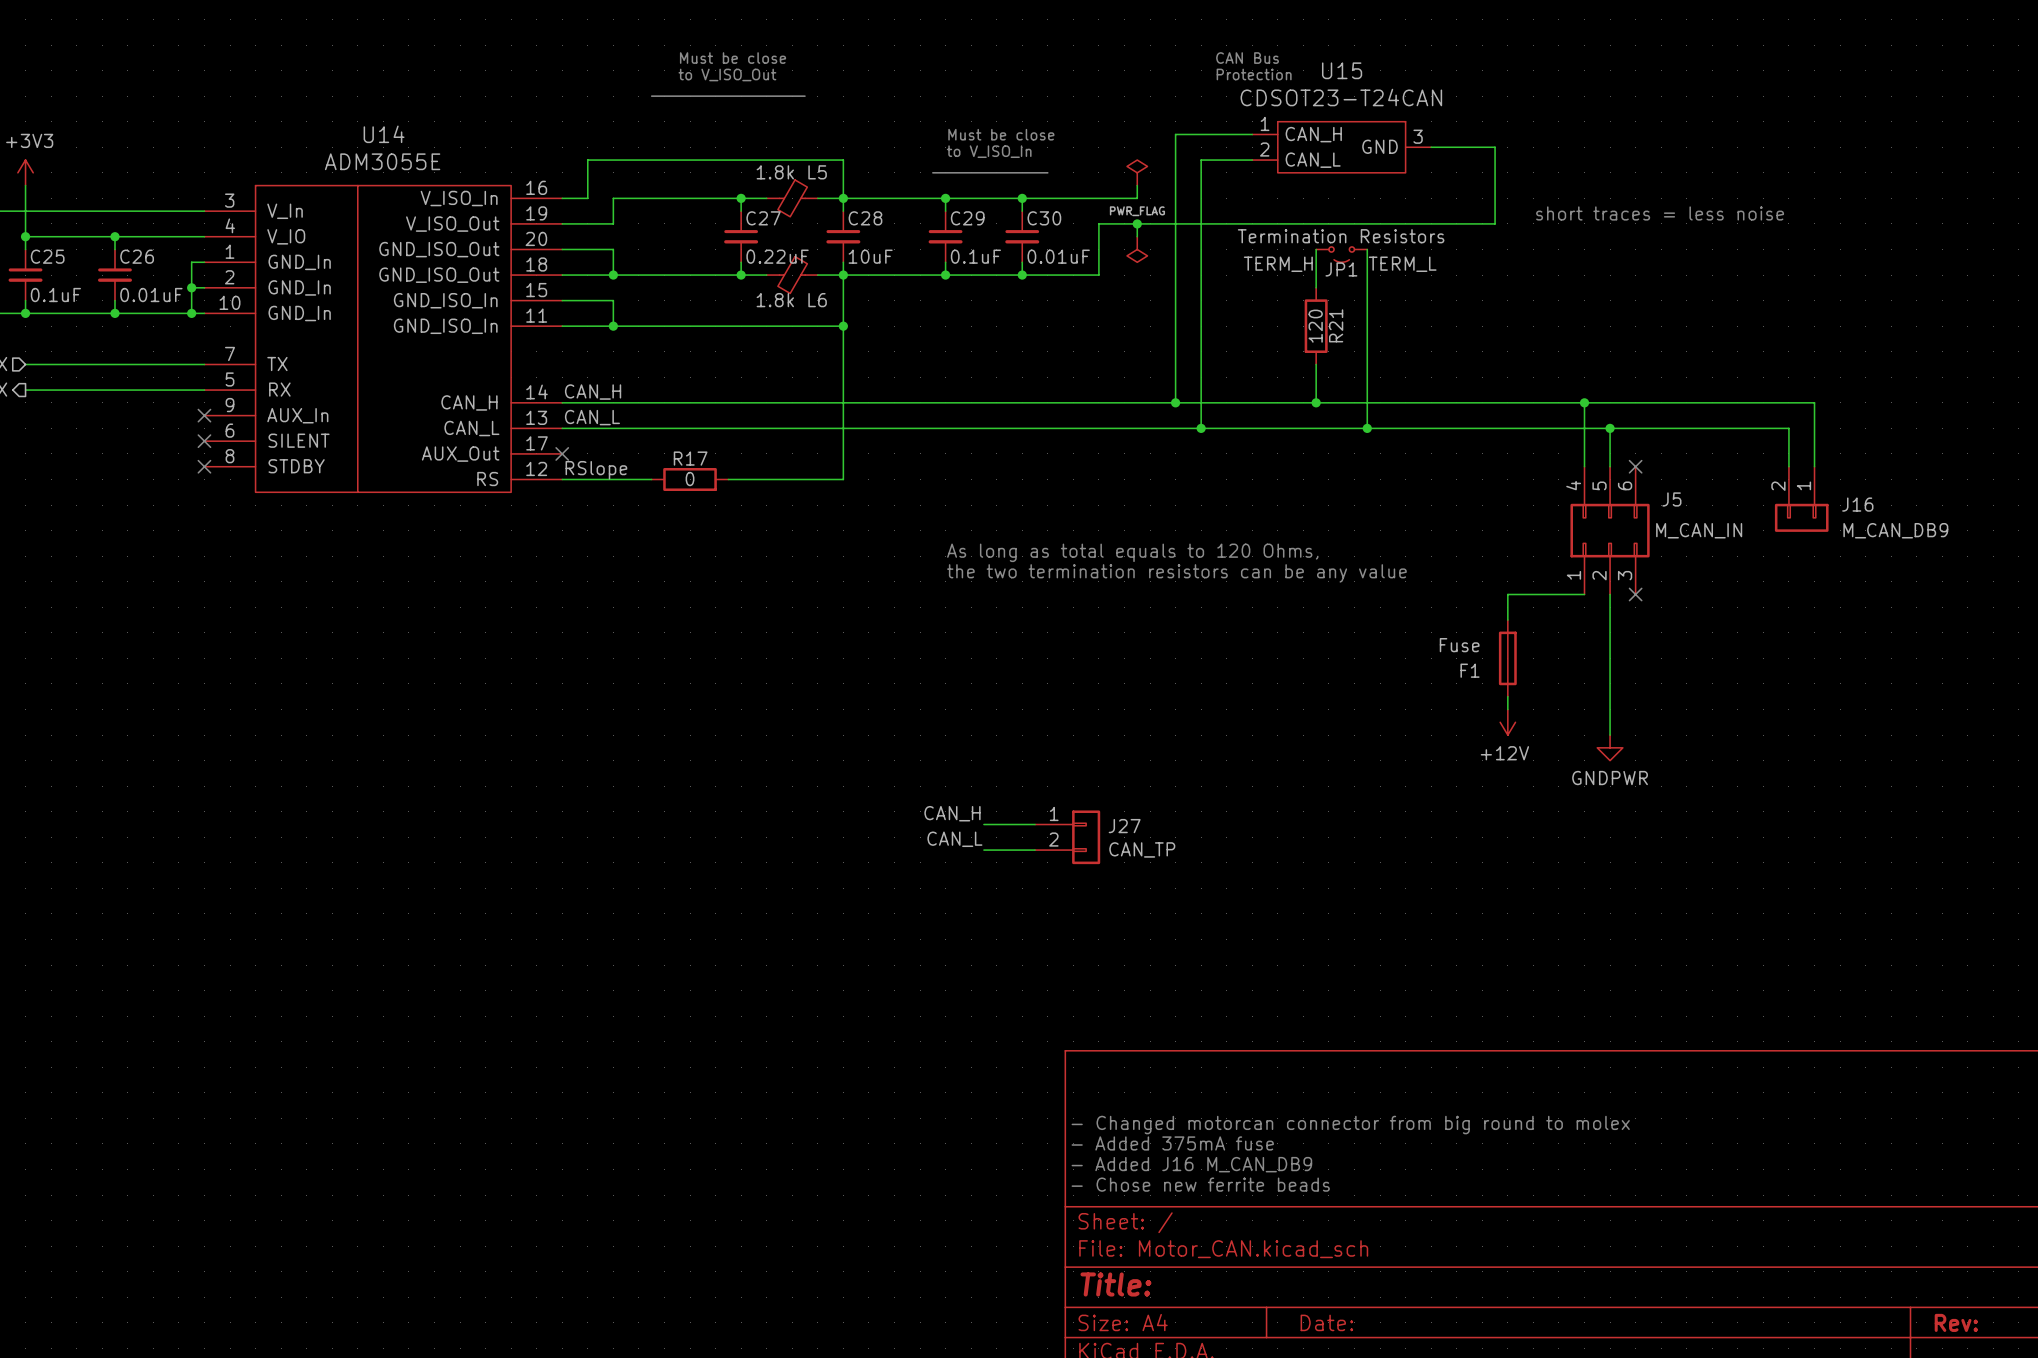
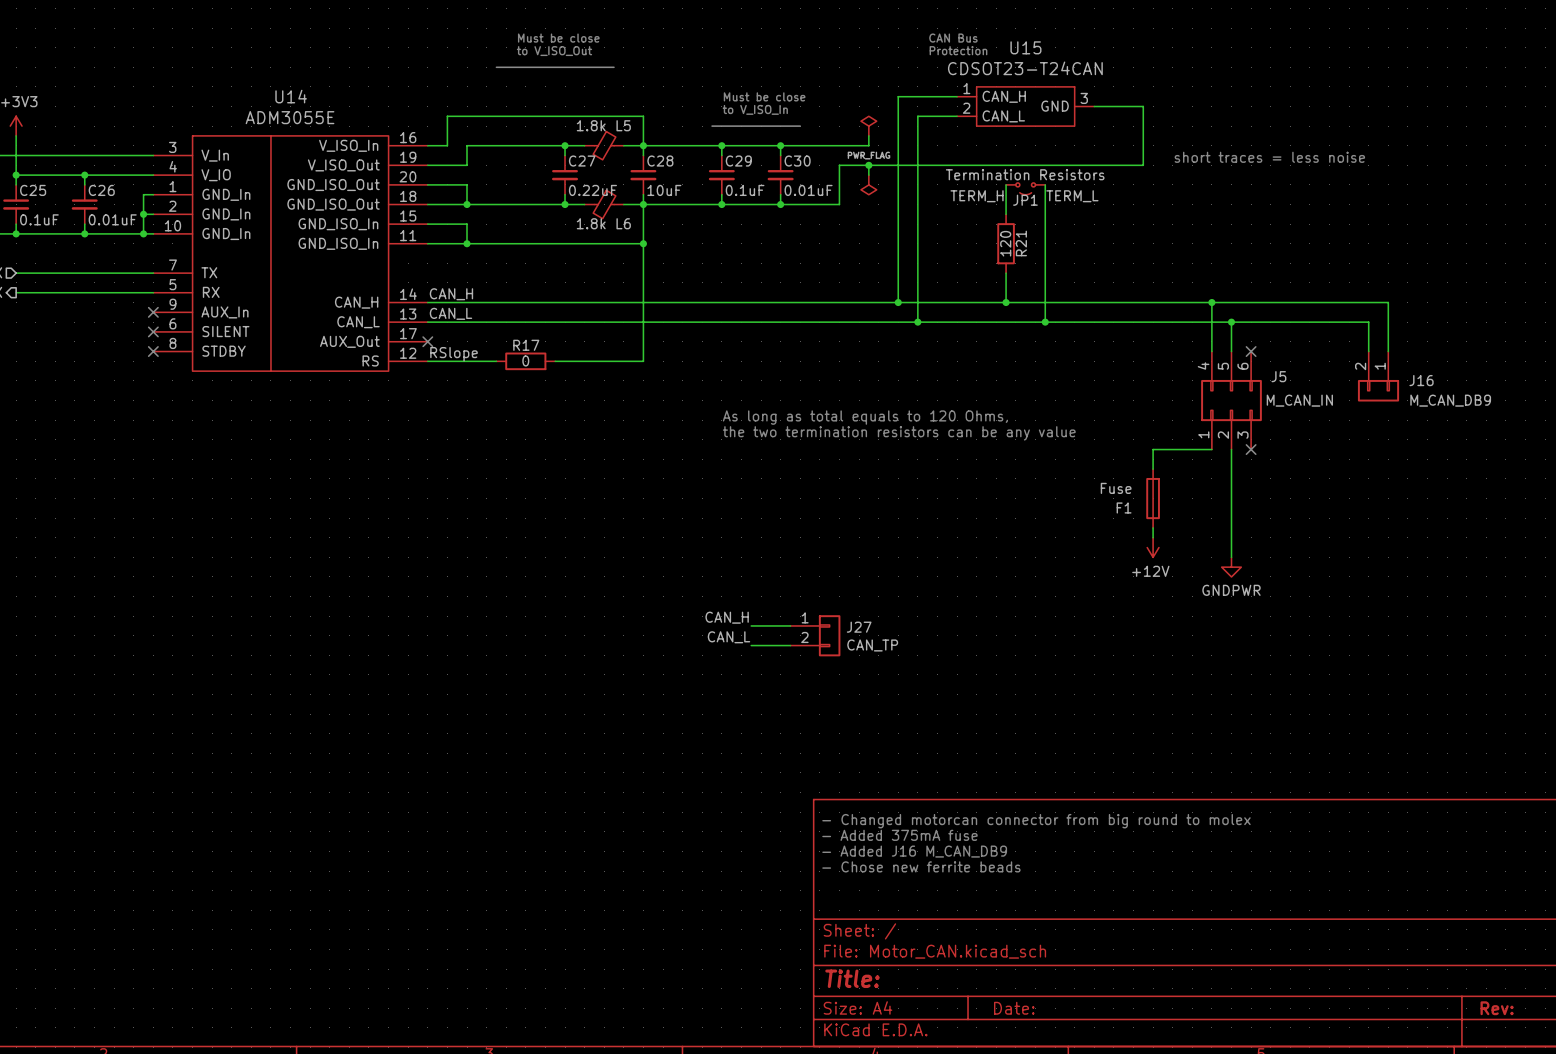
text: none -> - Changed motorcan connector from big round to molex (1036, 821)
text: none -> - Added 375mA fuse (899, 835)
text: - Changed motorcan connector from big round to molex (1350, 1125) -> - Added J16 M_CAN_DB9 (914, 851)
text: - Added 375mA fuse (1172, 1143) -> - Chose new ferrite beads (921, 866)
text: - Added J16 M_CAN_DB9 (1191, 1164) -> none
text: - Chose new ferrite beads (1200, 1184) -> none

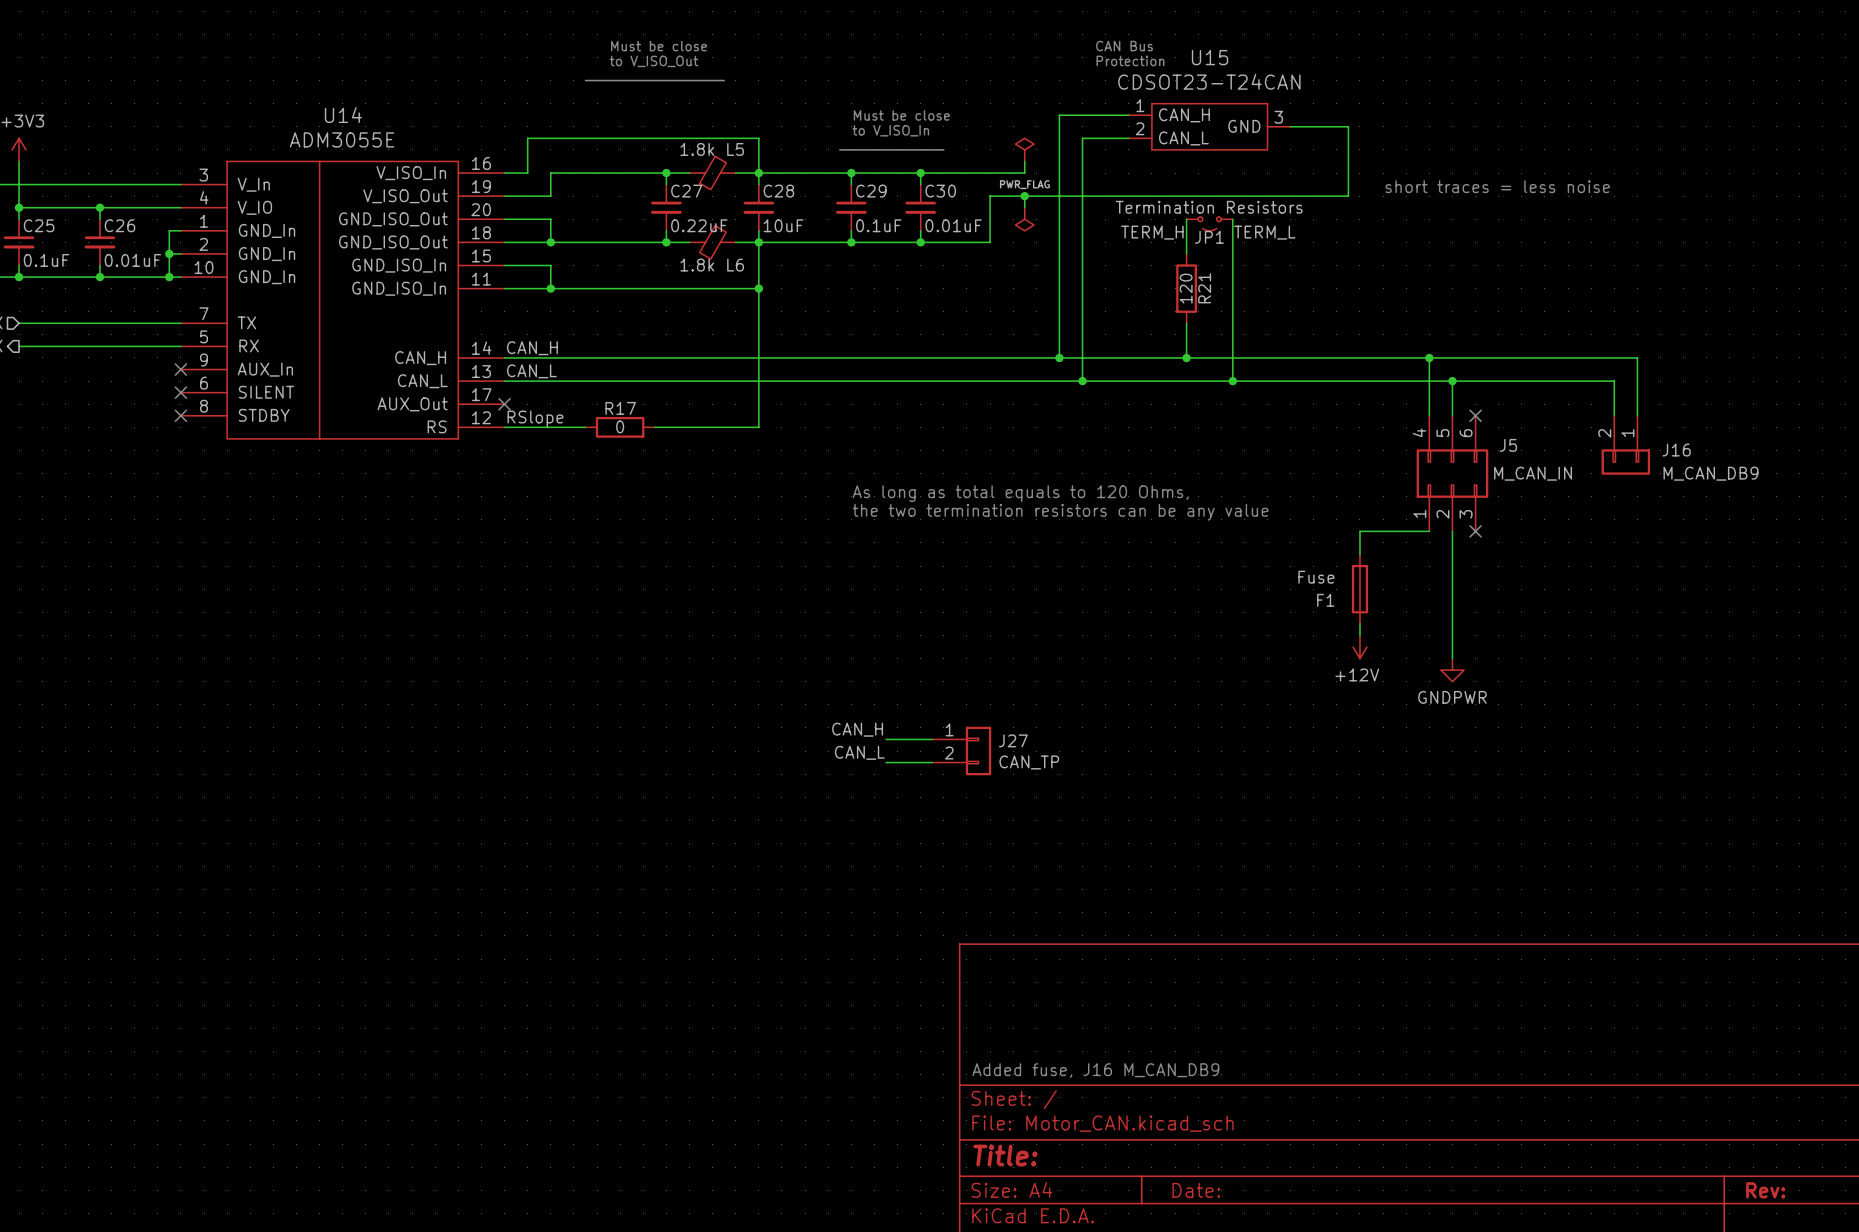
text: - Changed motorcan connector from big round to molex (1036, 821) -> none
text: - Added 375mA fuse (899, 835) -> none
text: - Added J16 M_CAN_DB9 (914, 851) -> none
text: - Chose new ferrite beads (921, 866) -> none
text: none -> Added fuse, J16 M_CAN_DB9 (1095, 1070)

